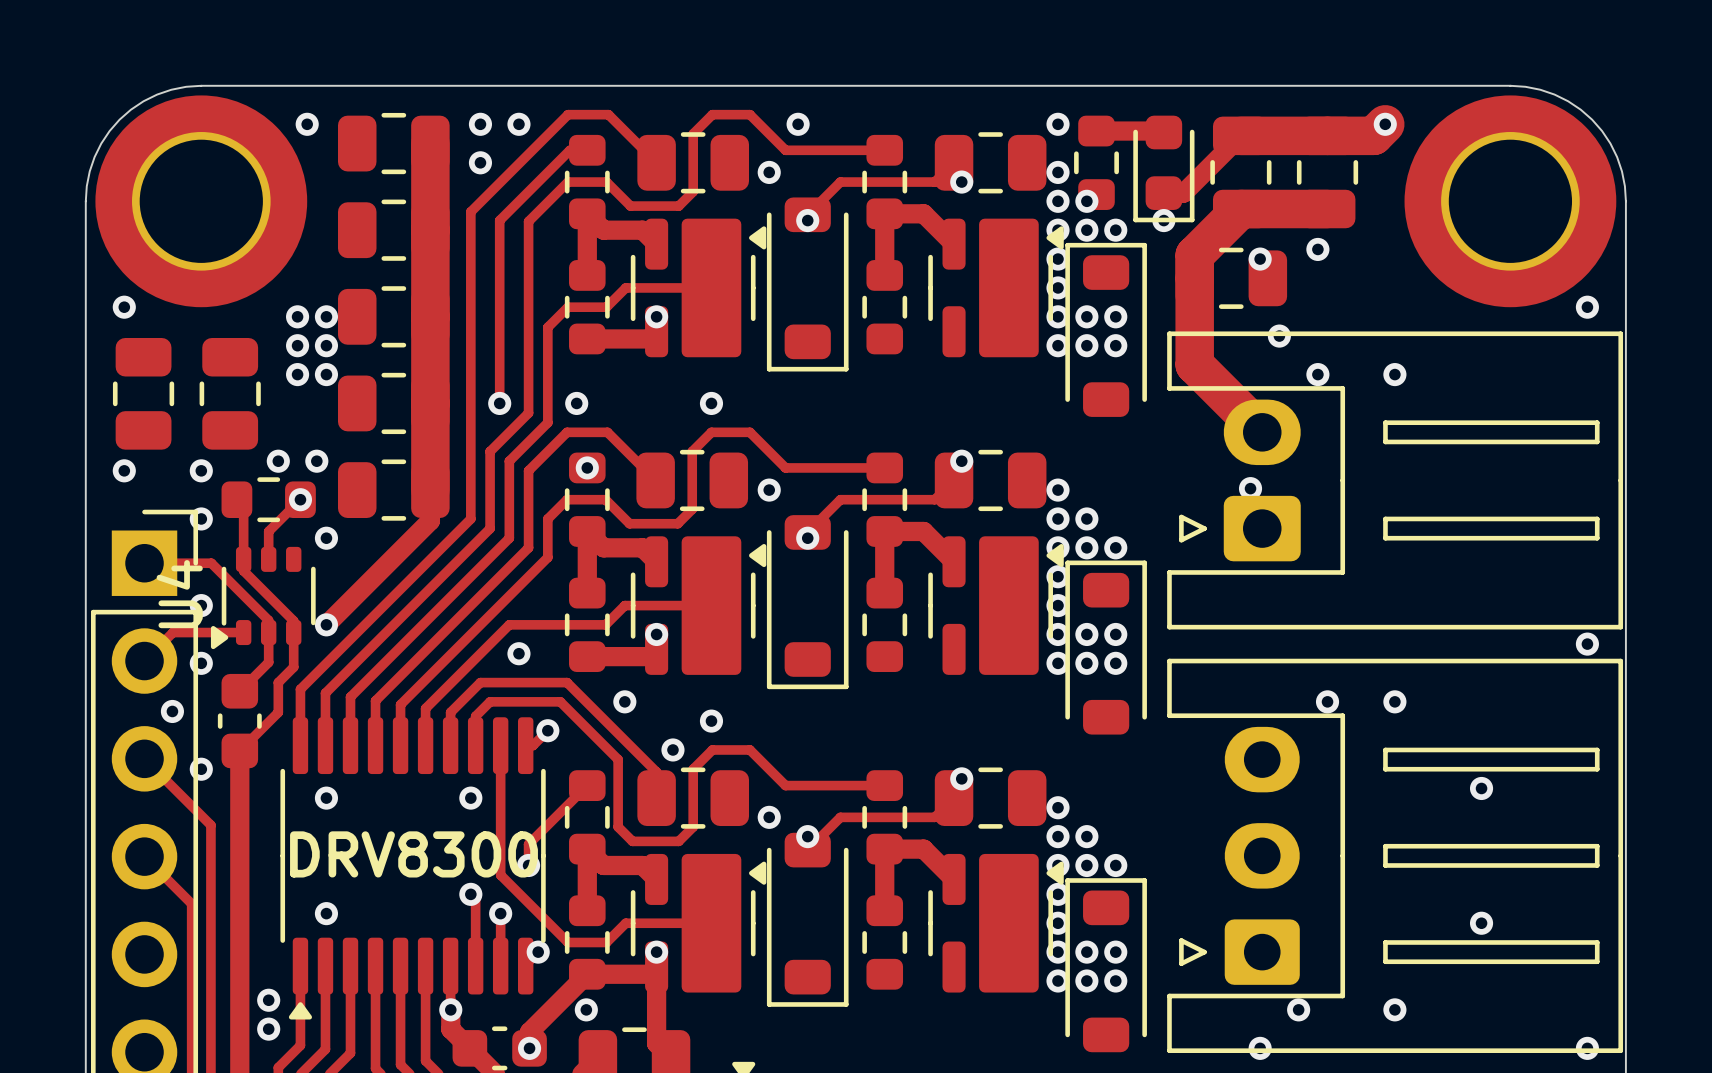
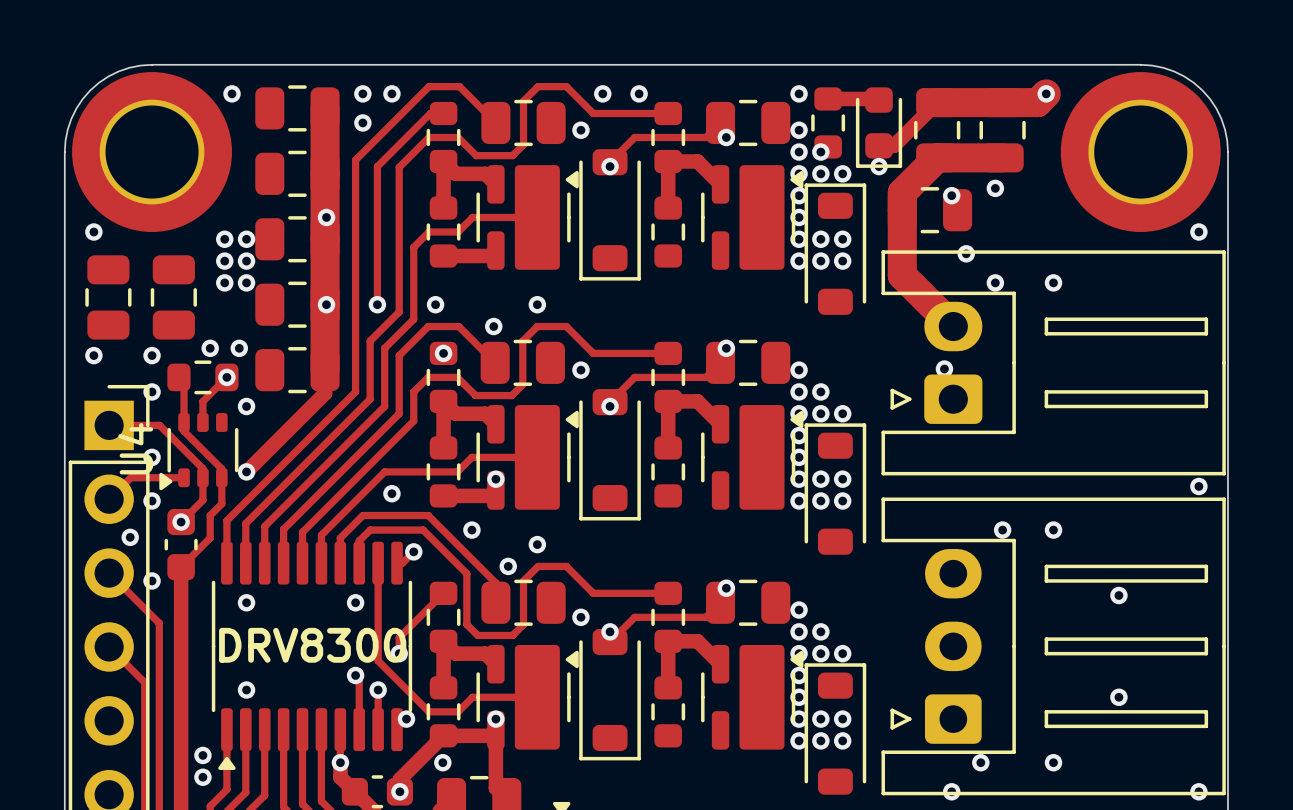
via: none -> (639, 93)
via: none -> (326, 217)
via: (656, 316) -> none
via: none -> (326, 304)
via: none -> (493, 326)
via: none -> (181, 522)

